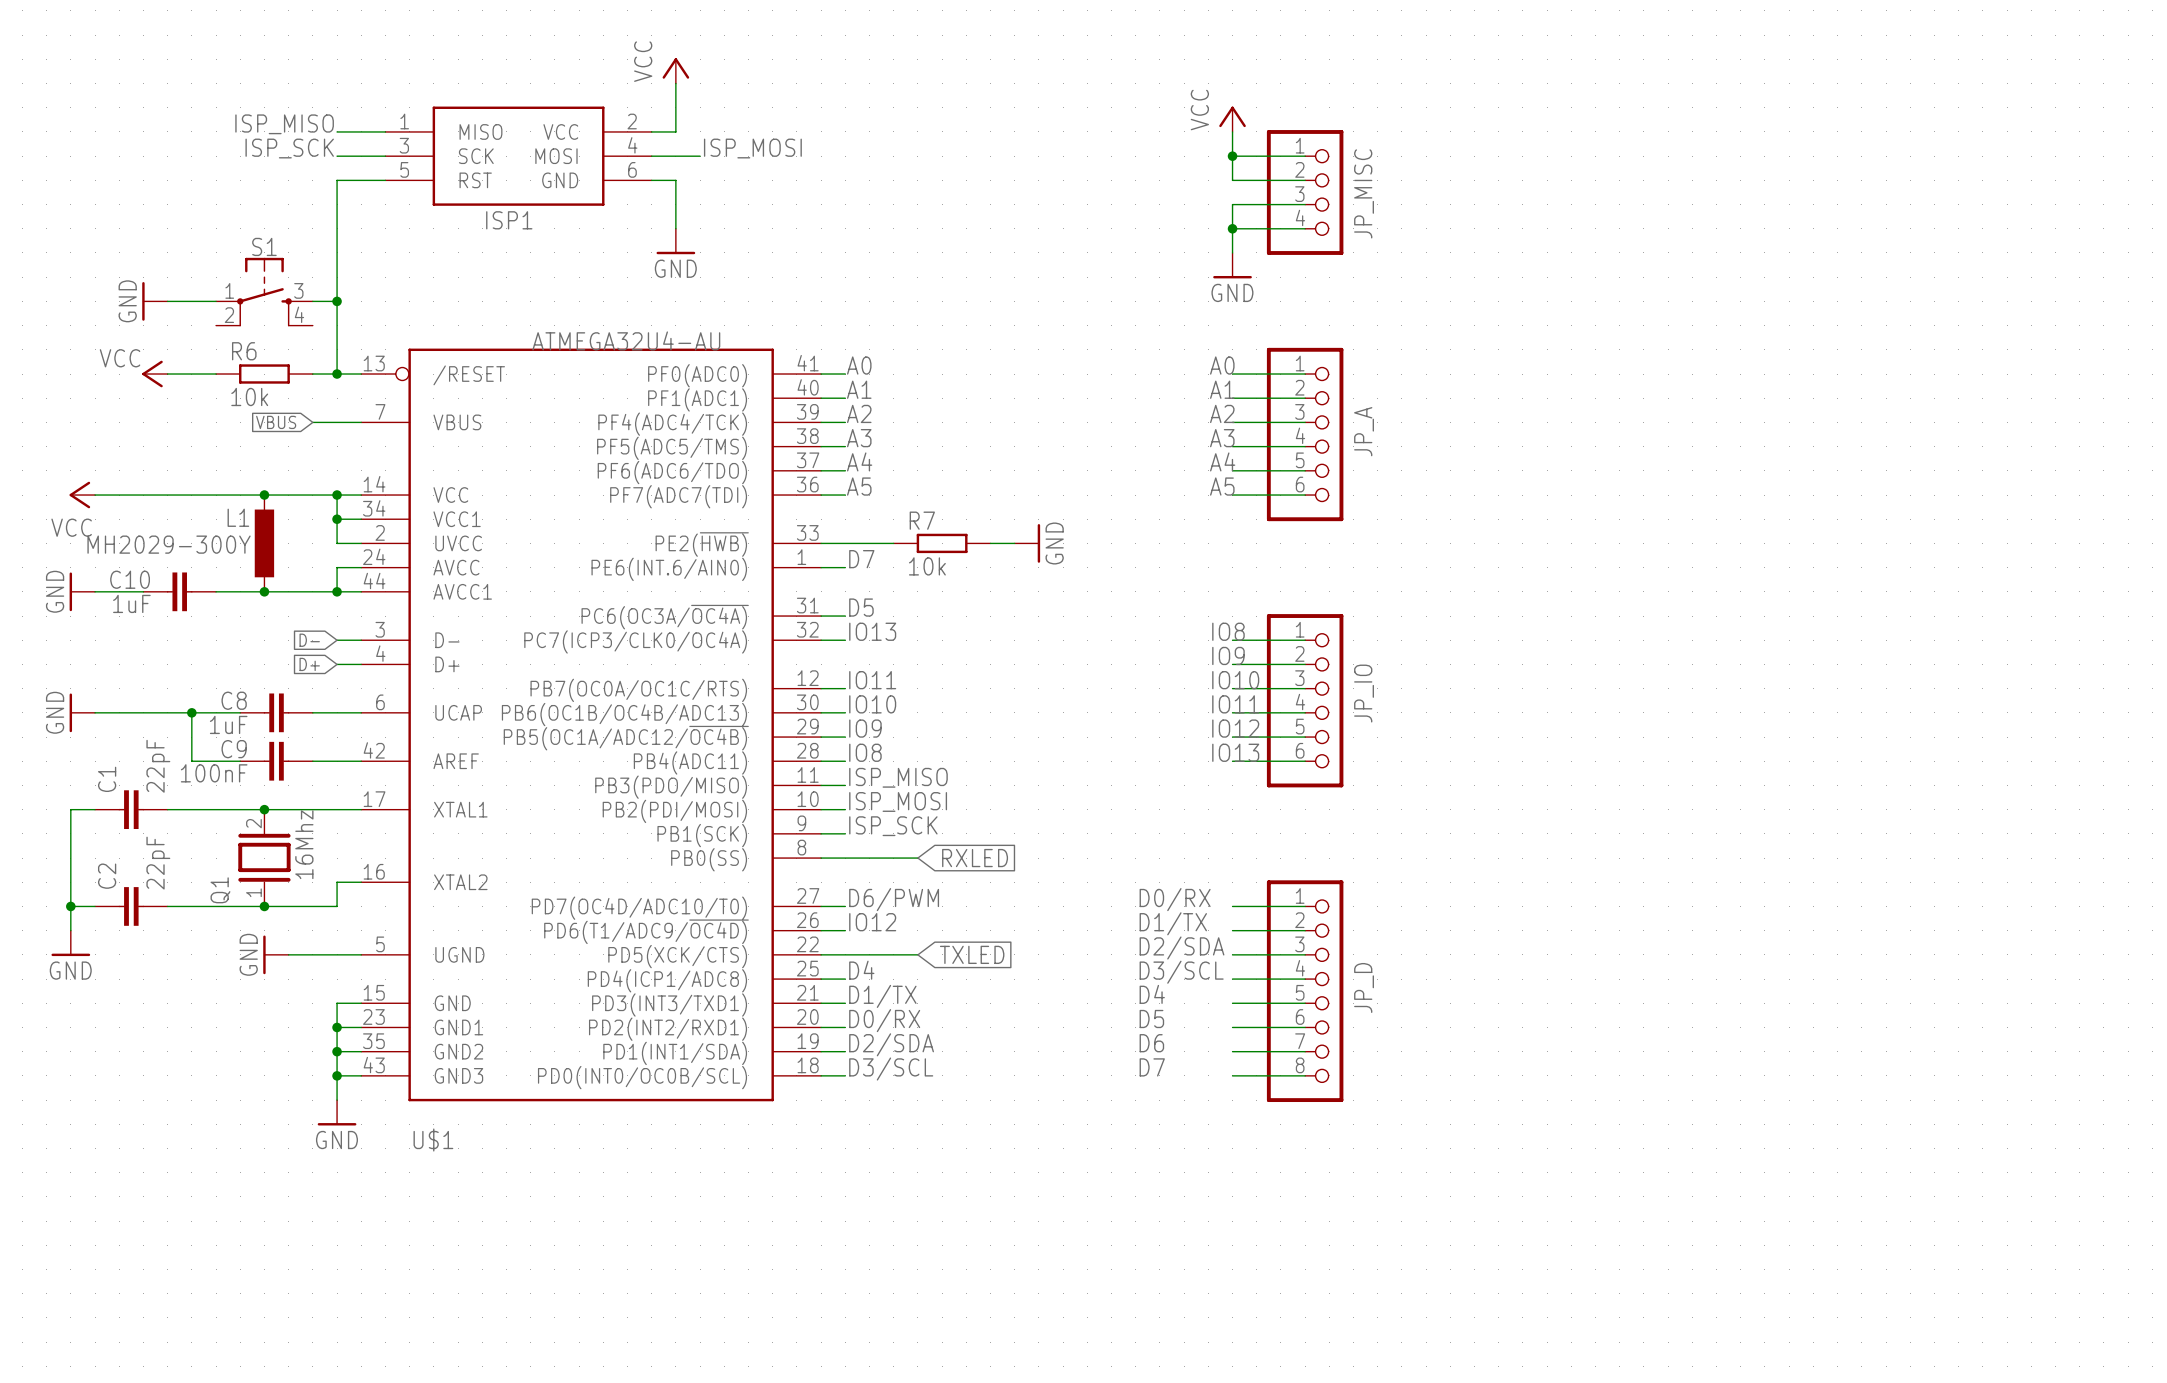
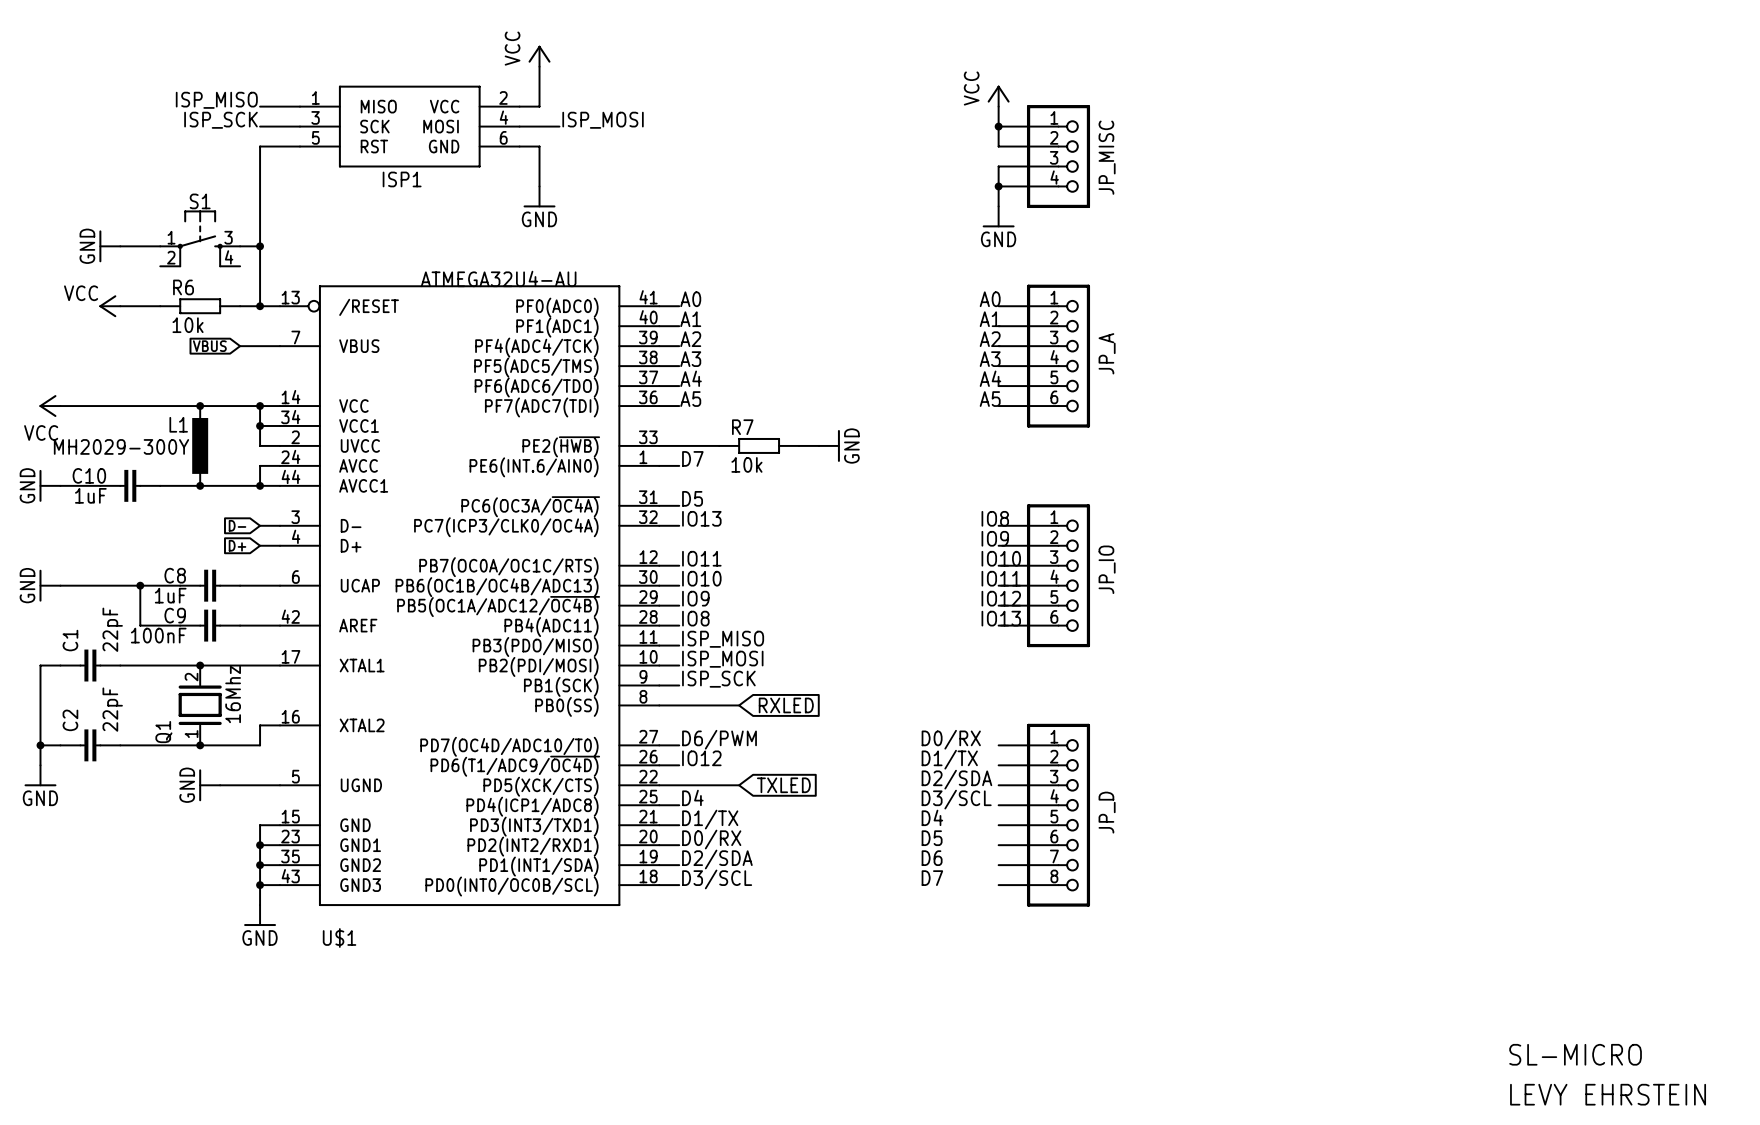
text: none -> SL-MICRO (1575, 1054)
text: none -> LEVY EHRSTEIN (1608, 1094)

